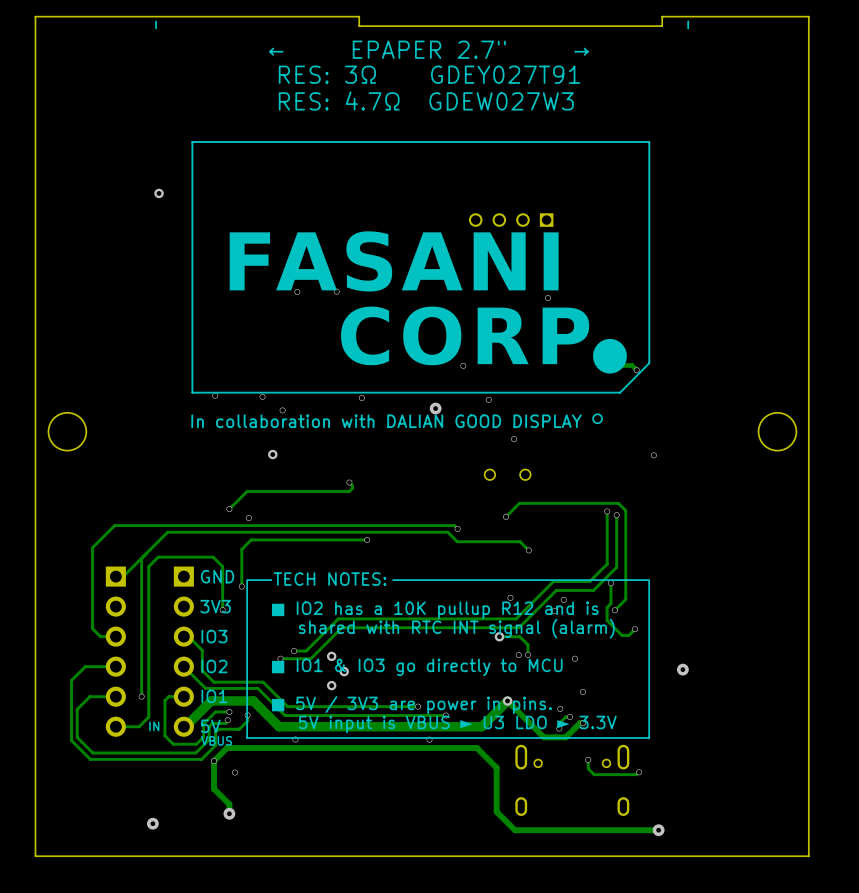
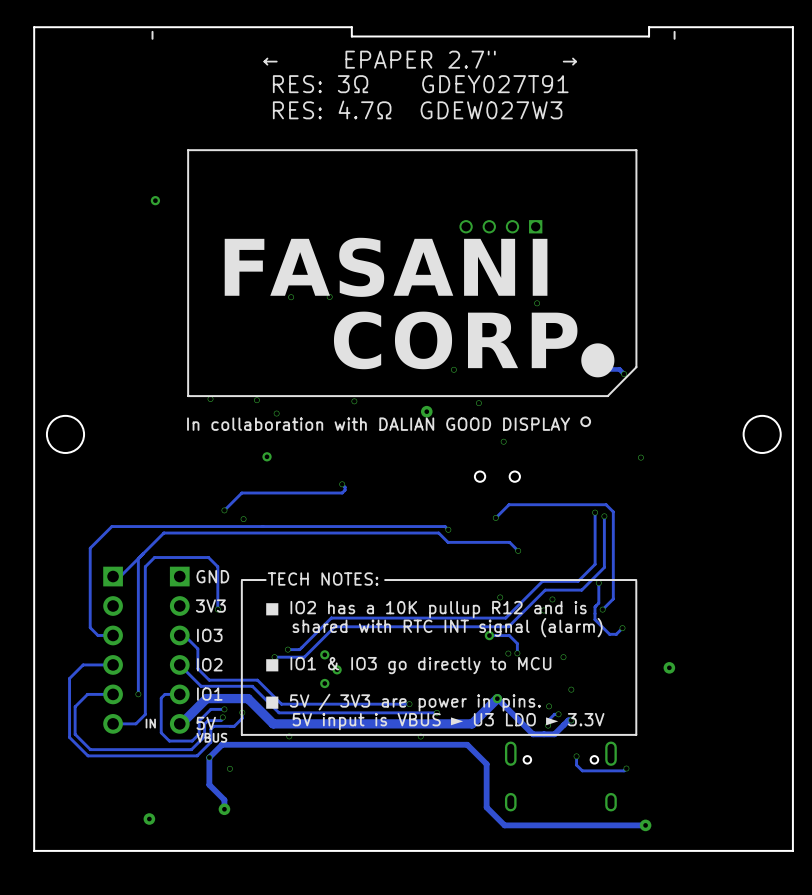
track: (367, 539) (251, 539) (241, 549) (241, 586) -> none
via: (367, 539) -> none
via: (241, 586) -> none

